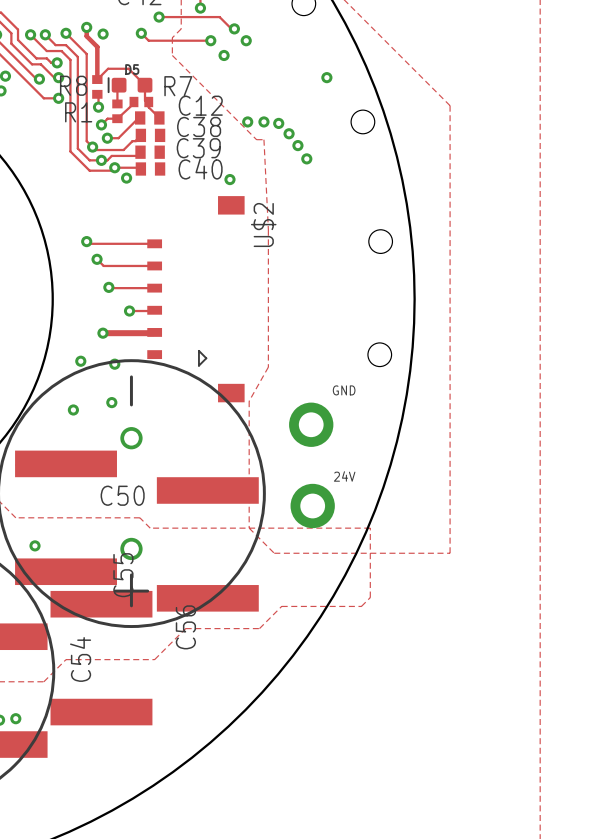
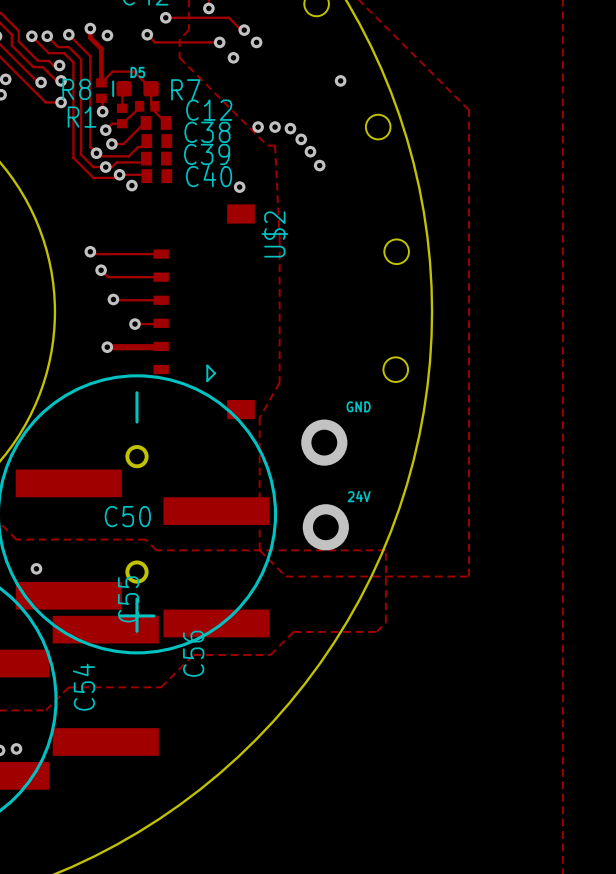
via: (80, 361) -> none
via: (114, 364) -> none
via: (111, 402) -> none
via: (73, 409) -> none

